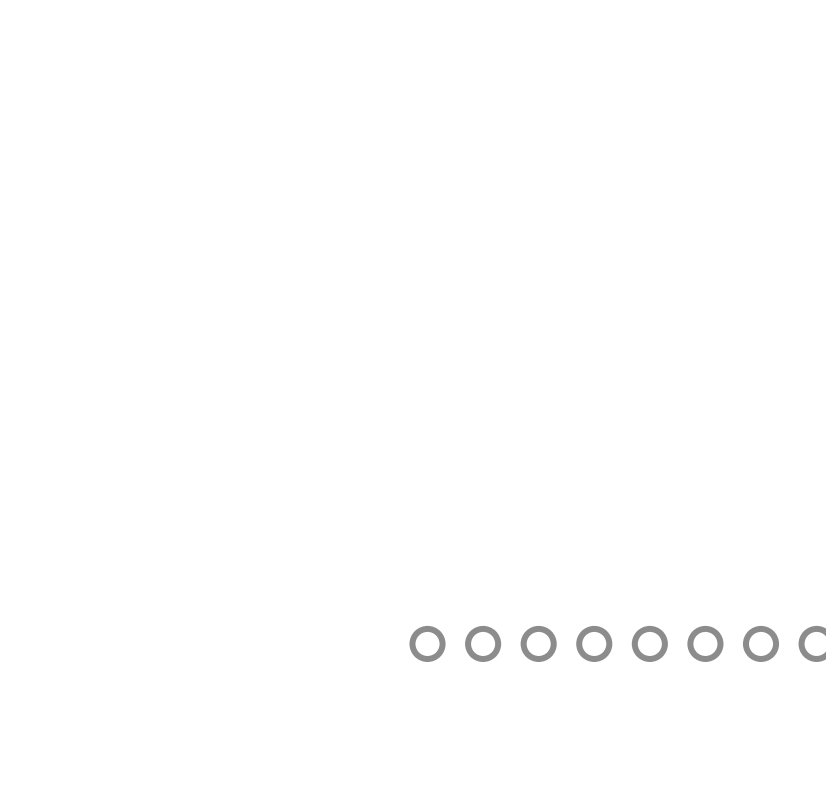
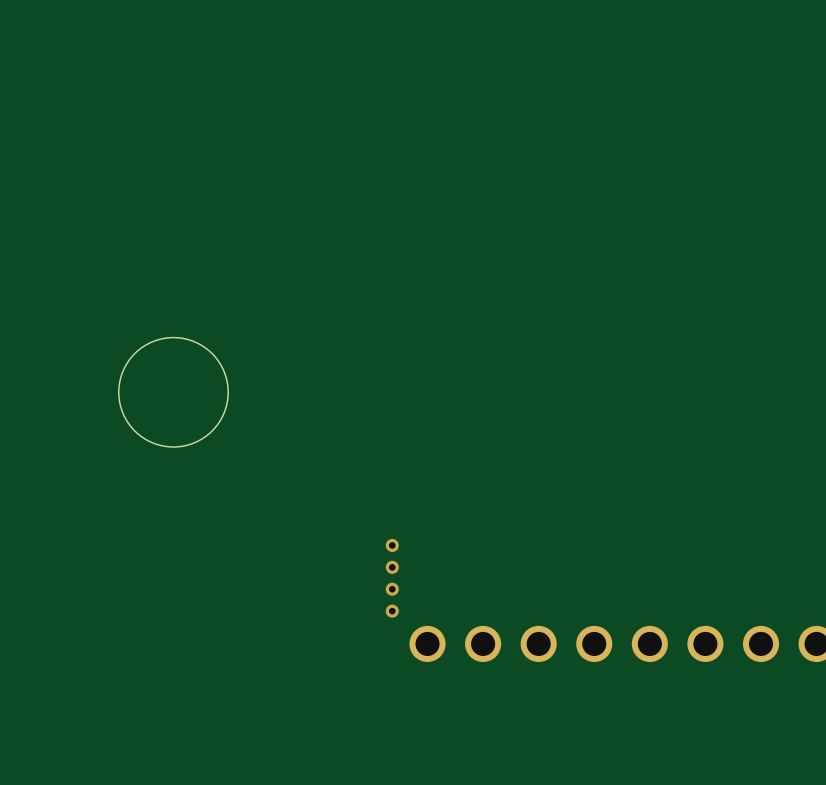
round board edge: none -> [118, 337, 229, 448]
via: none -> (392, 545)
via: none -> (392, 567)
via: none -> (392, 589)
via: none -> (392, 611)

